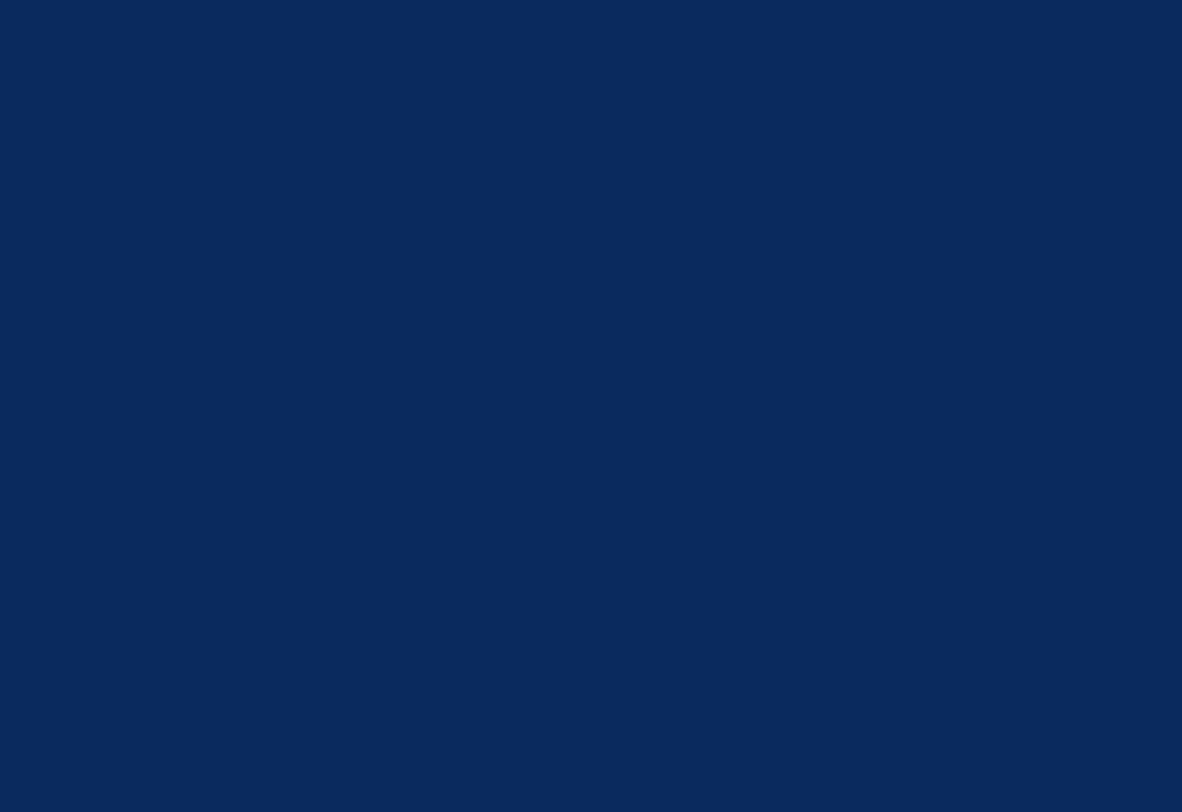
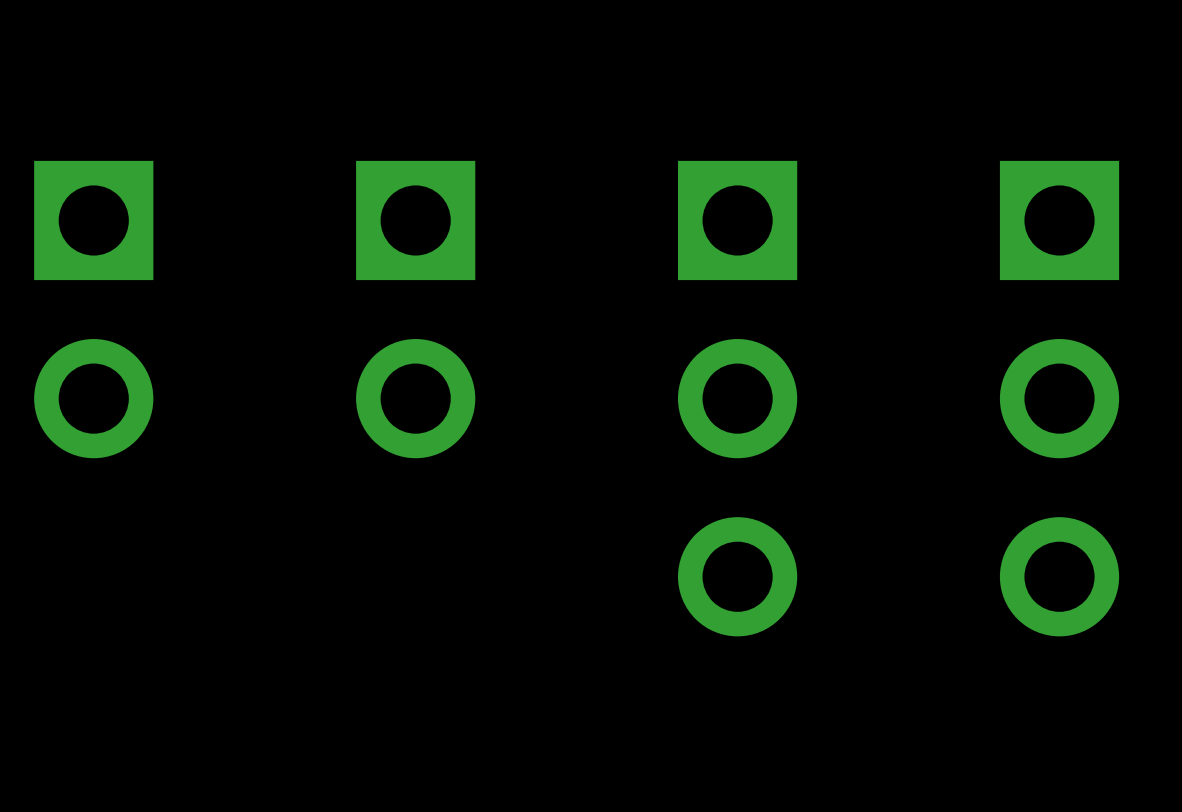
part: none -> (93, 309)
part: none -> (415, 309)
part: none -> (737, 398)
part: none -> (1059, 398)

